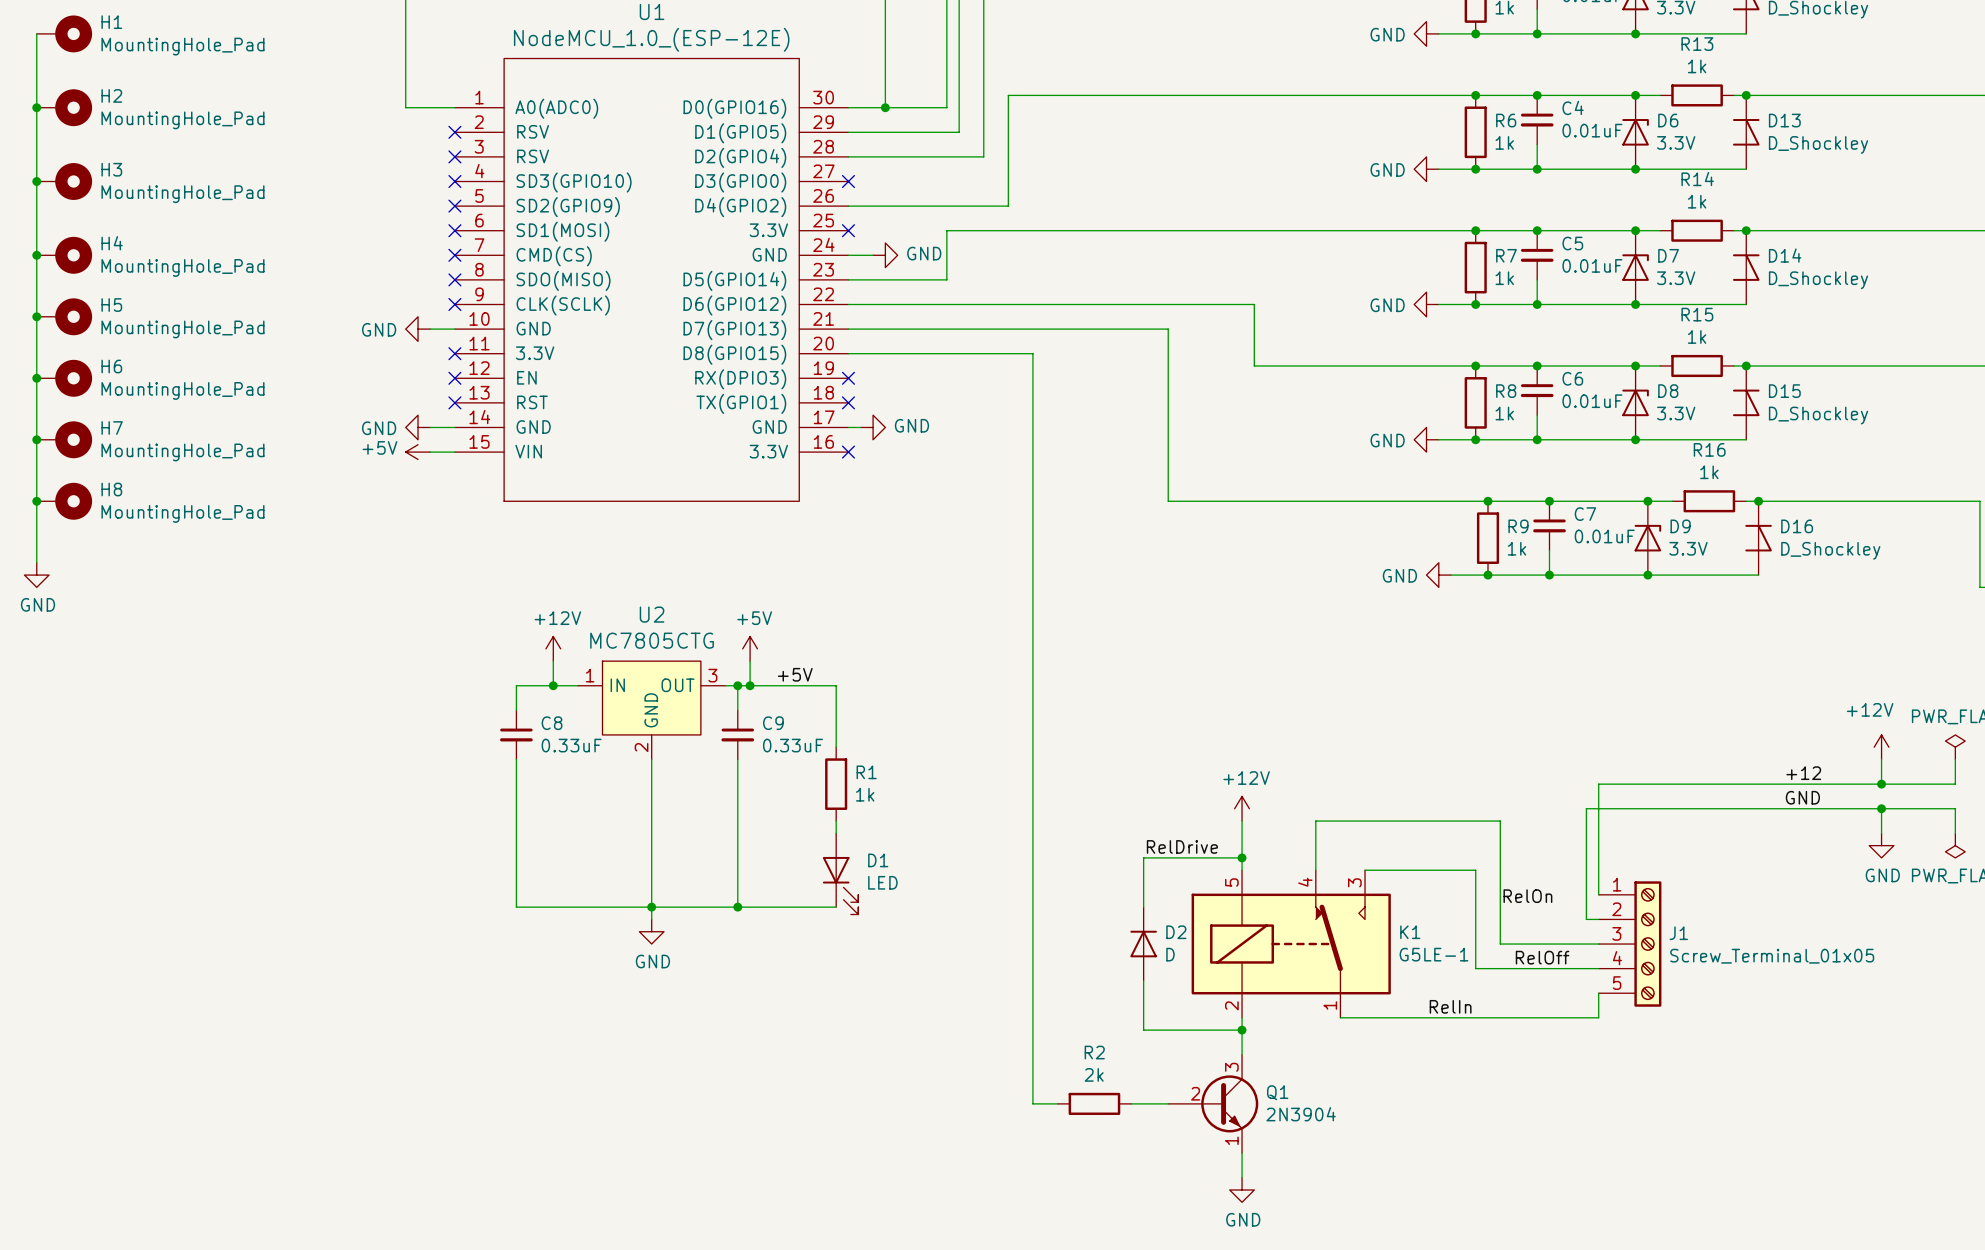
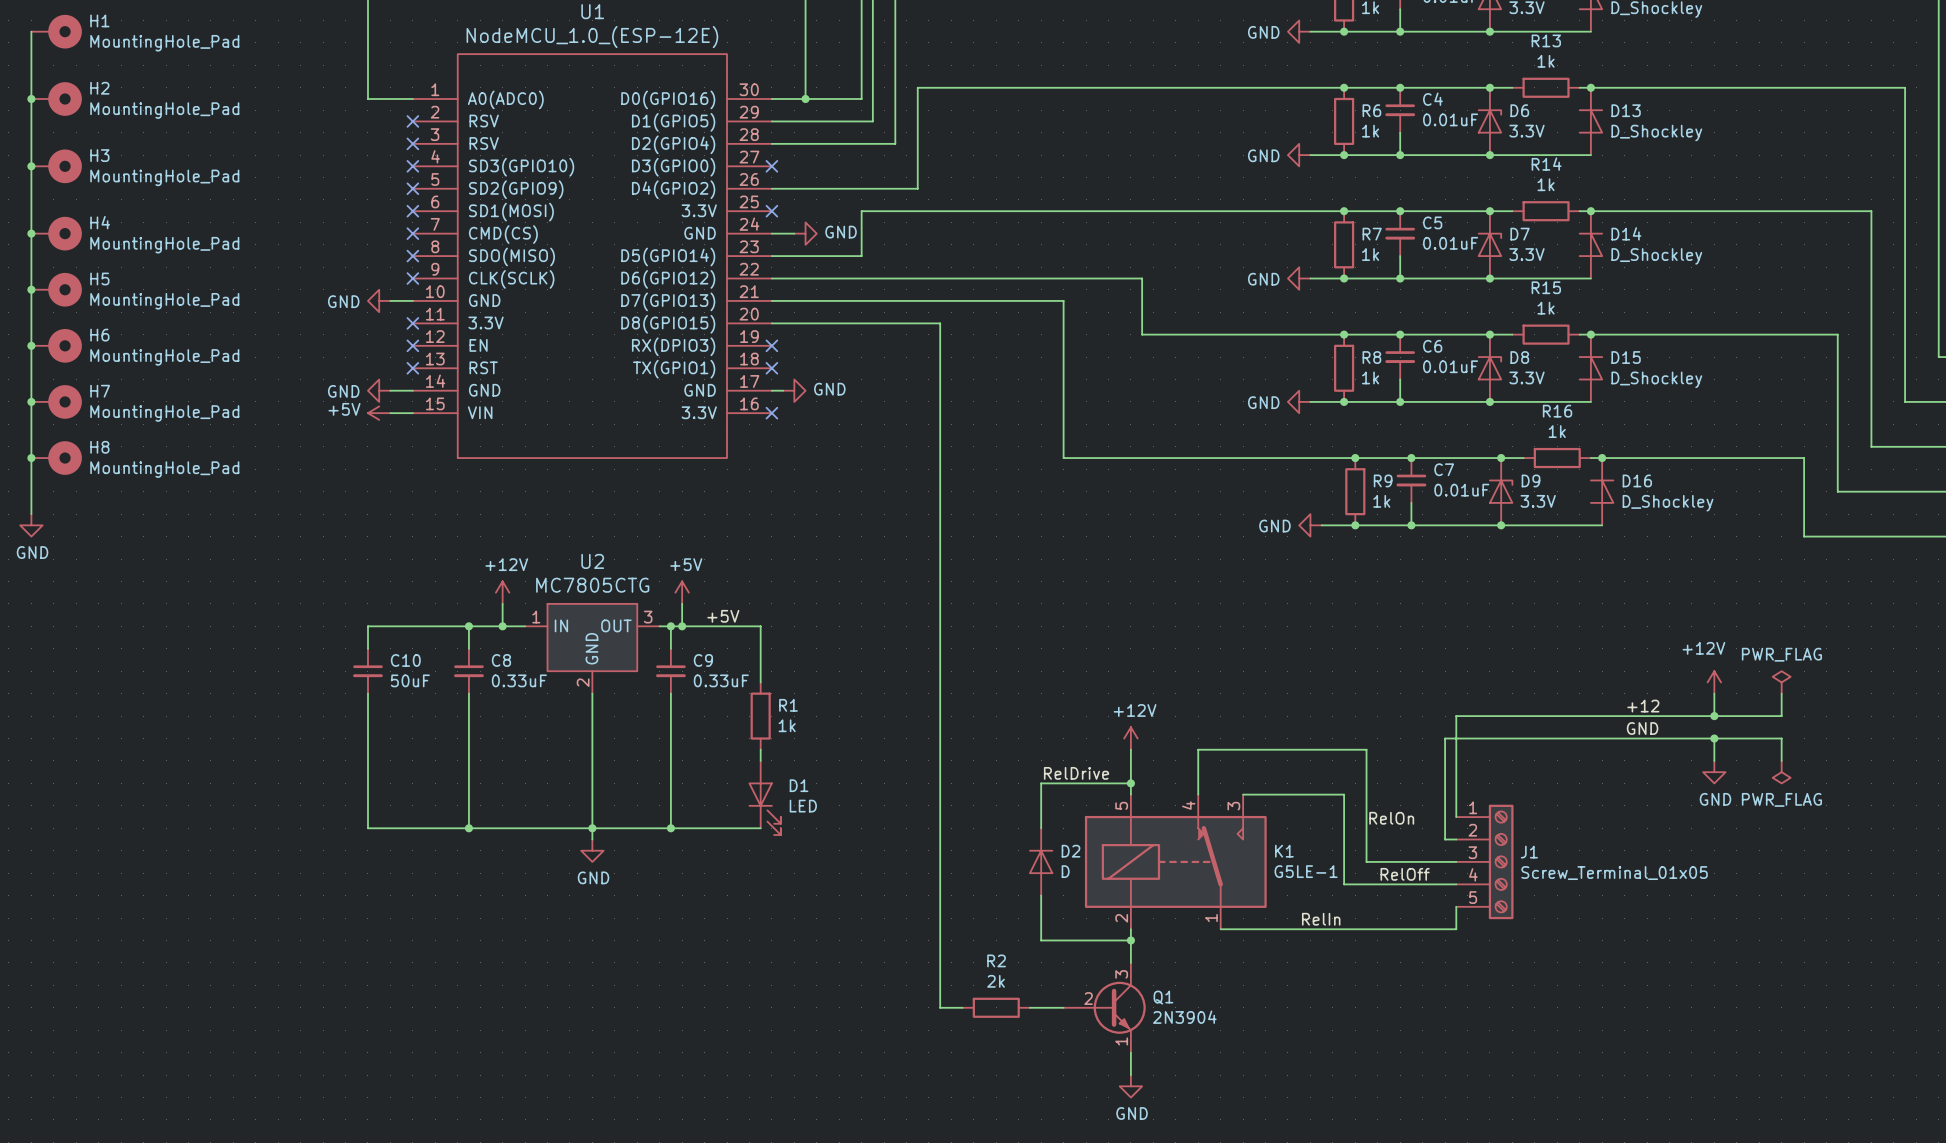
wire: none -> (468, 626) (367, 626) (367, 648)
junction: none -> (468, 626)
C10: none -> 50uF (367, 671)
wire: none -> (367, 693) (367, 828) (468, 828)
junction: none -> (468, 828)

